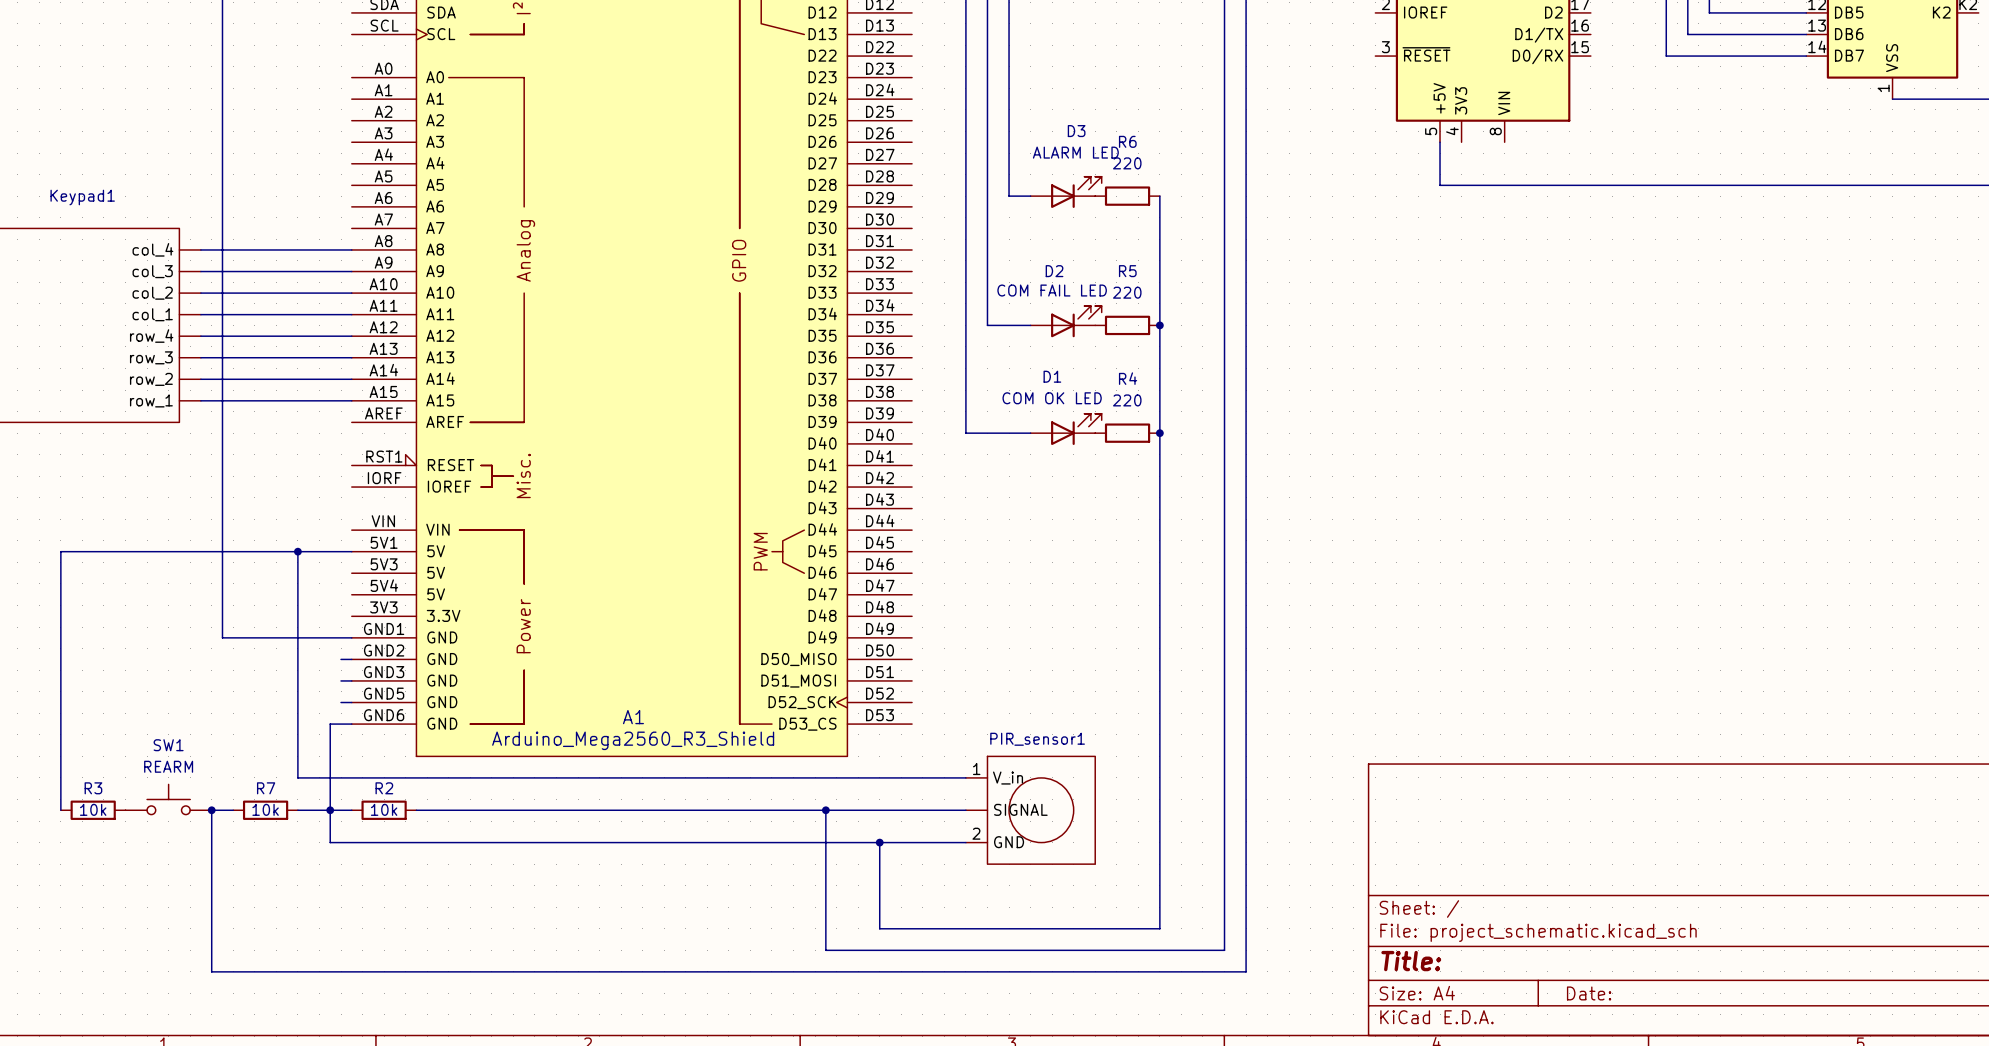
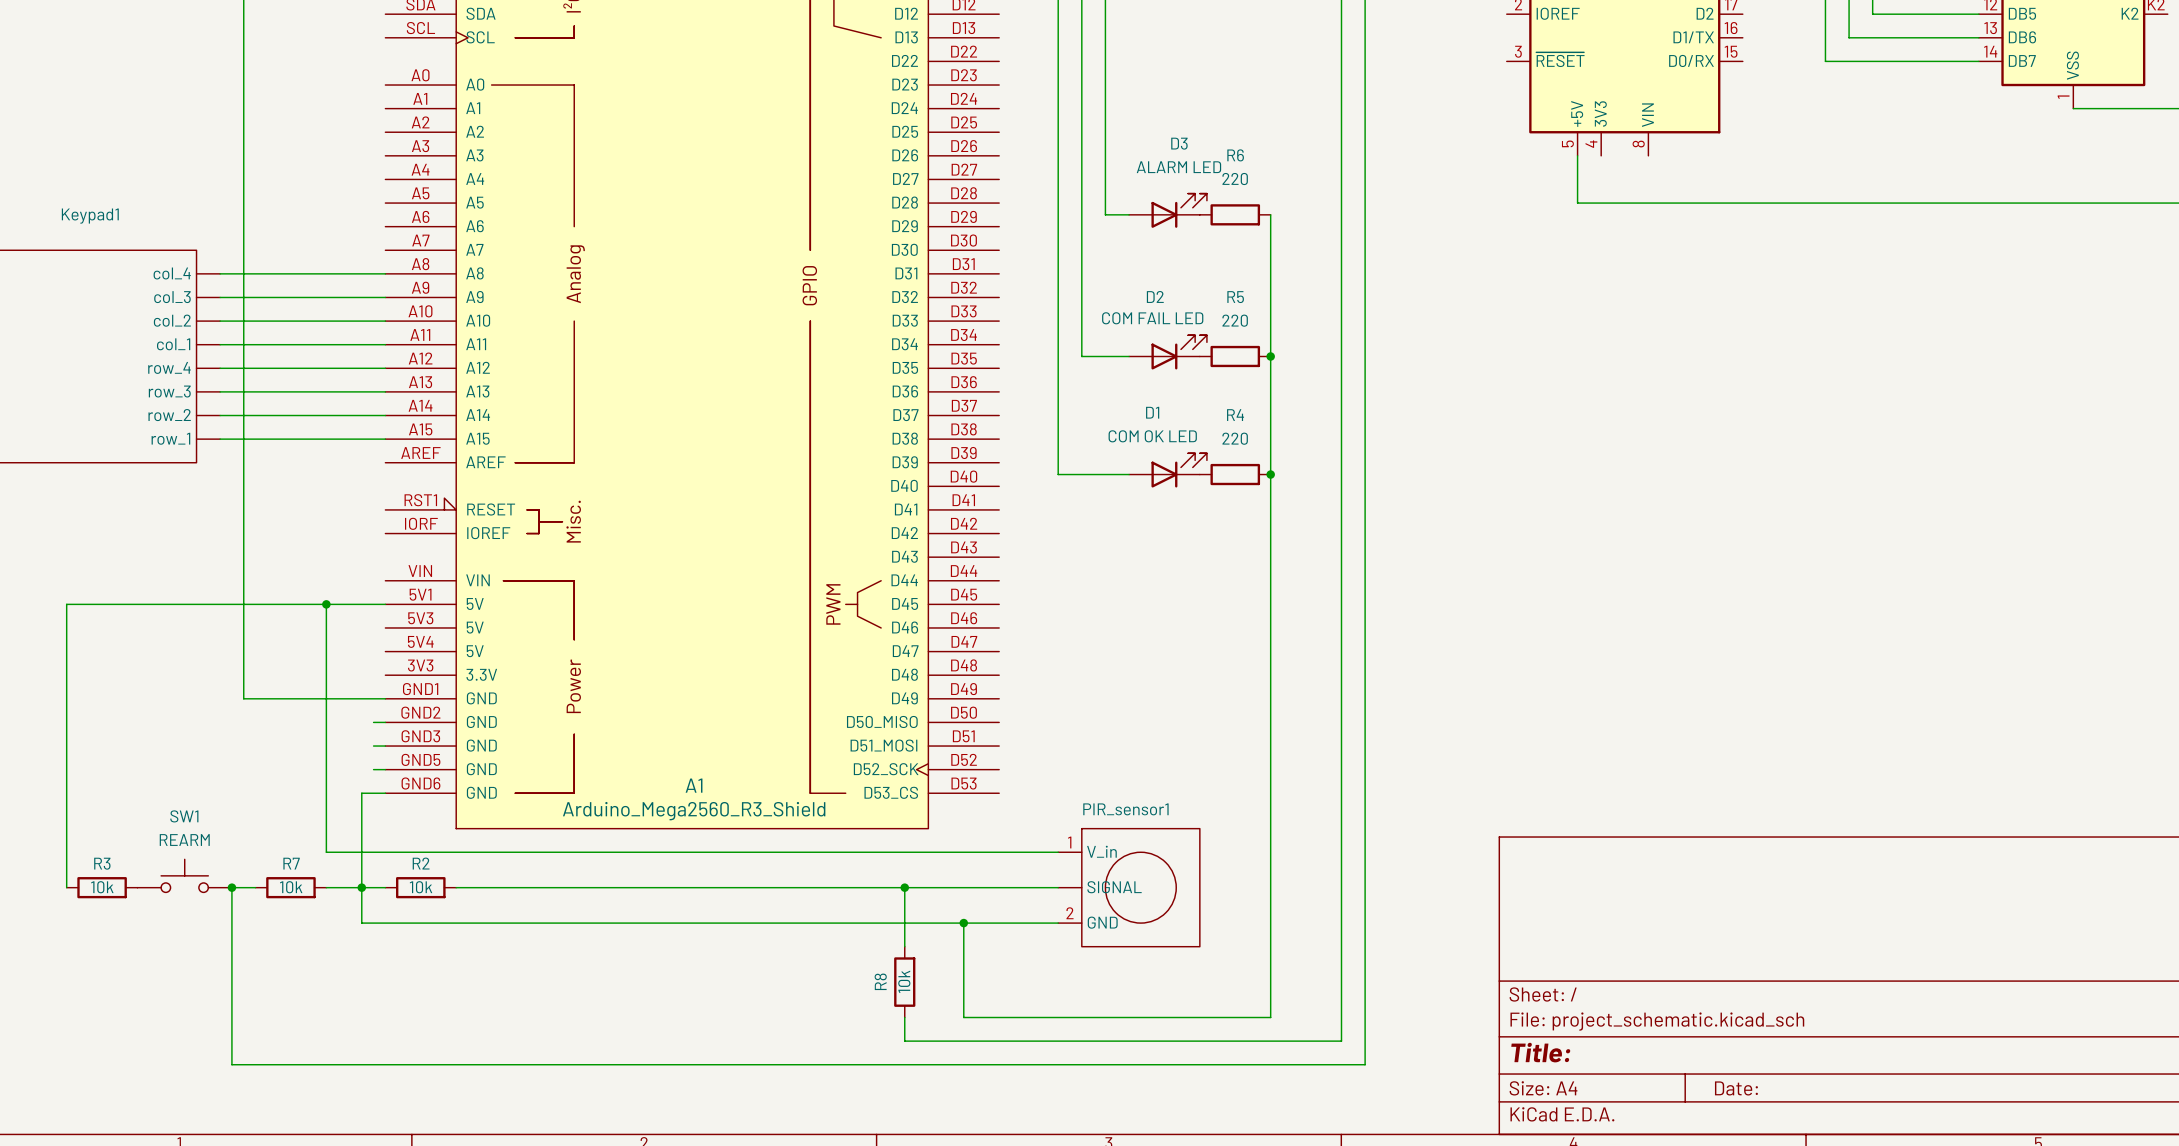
wire: (825, 864) (825, 928) -> none
R8: none -> 10k (904, 982)

